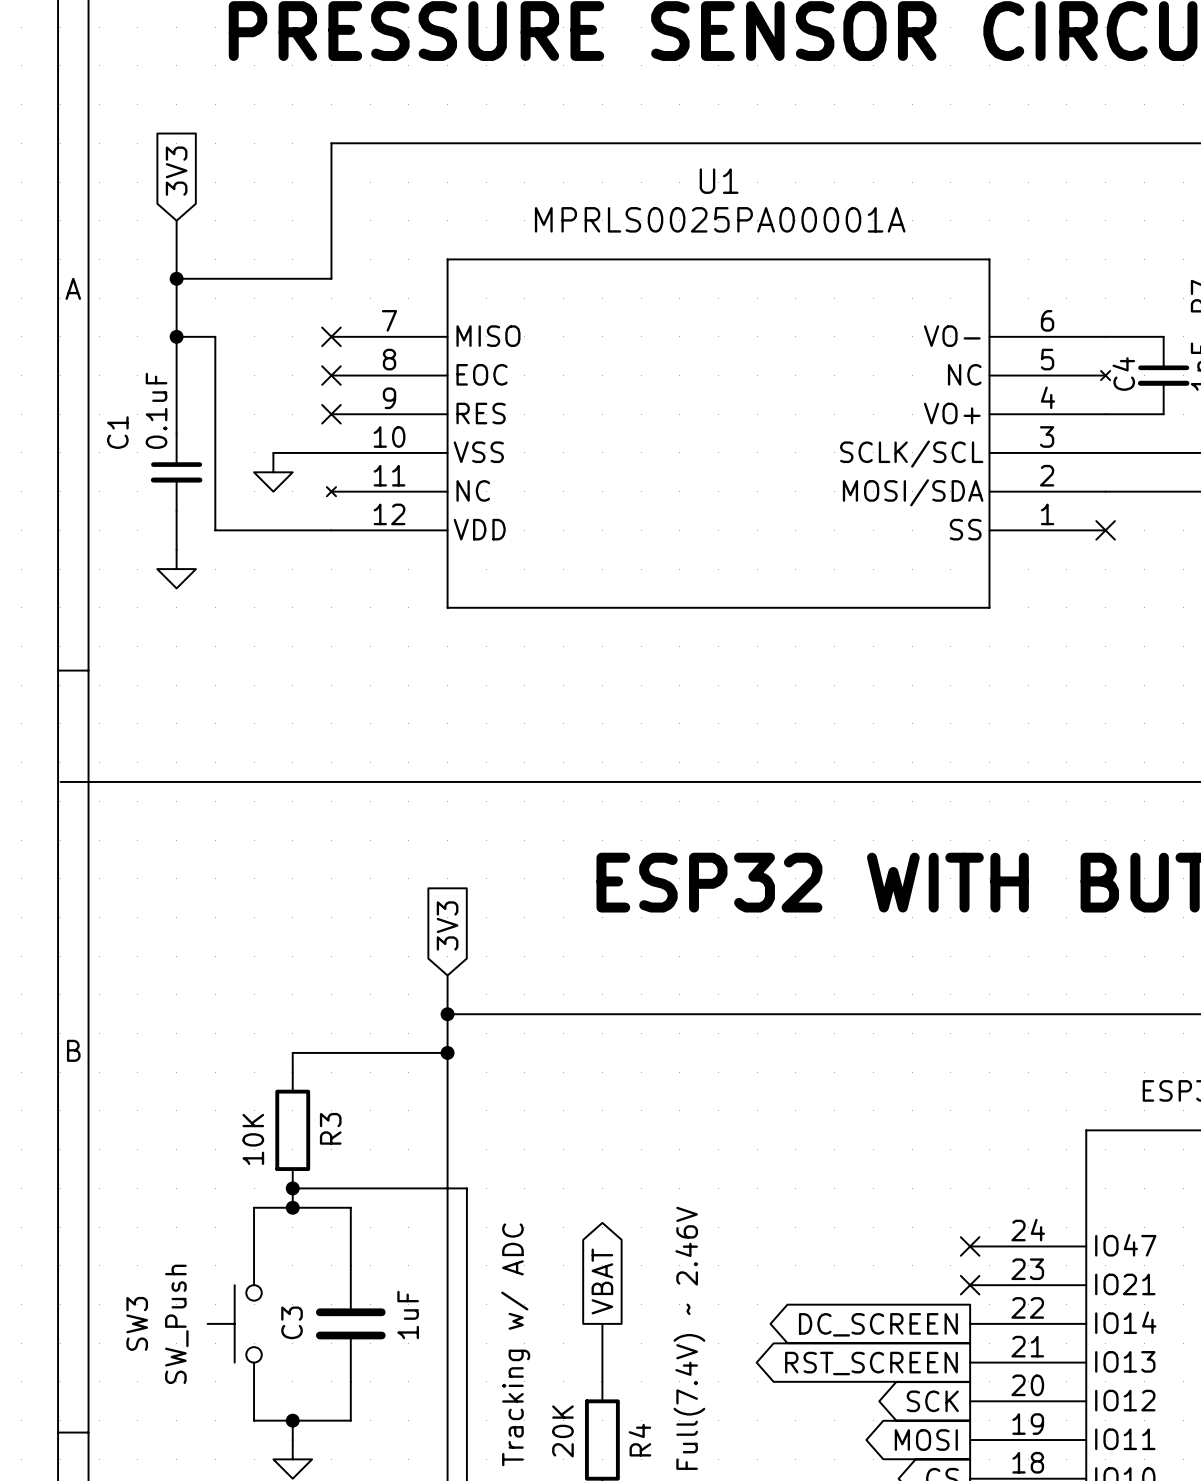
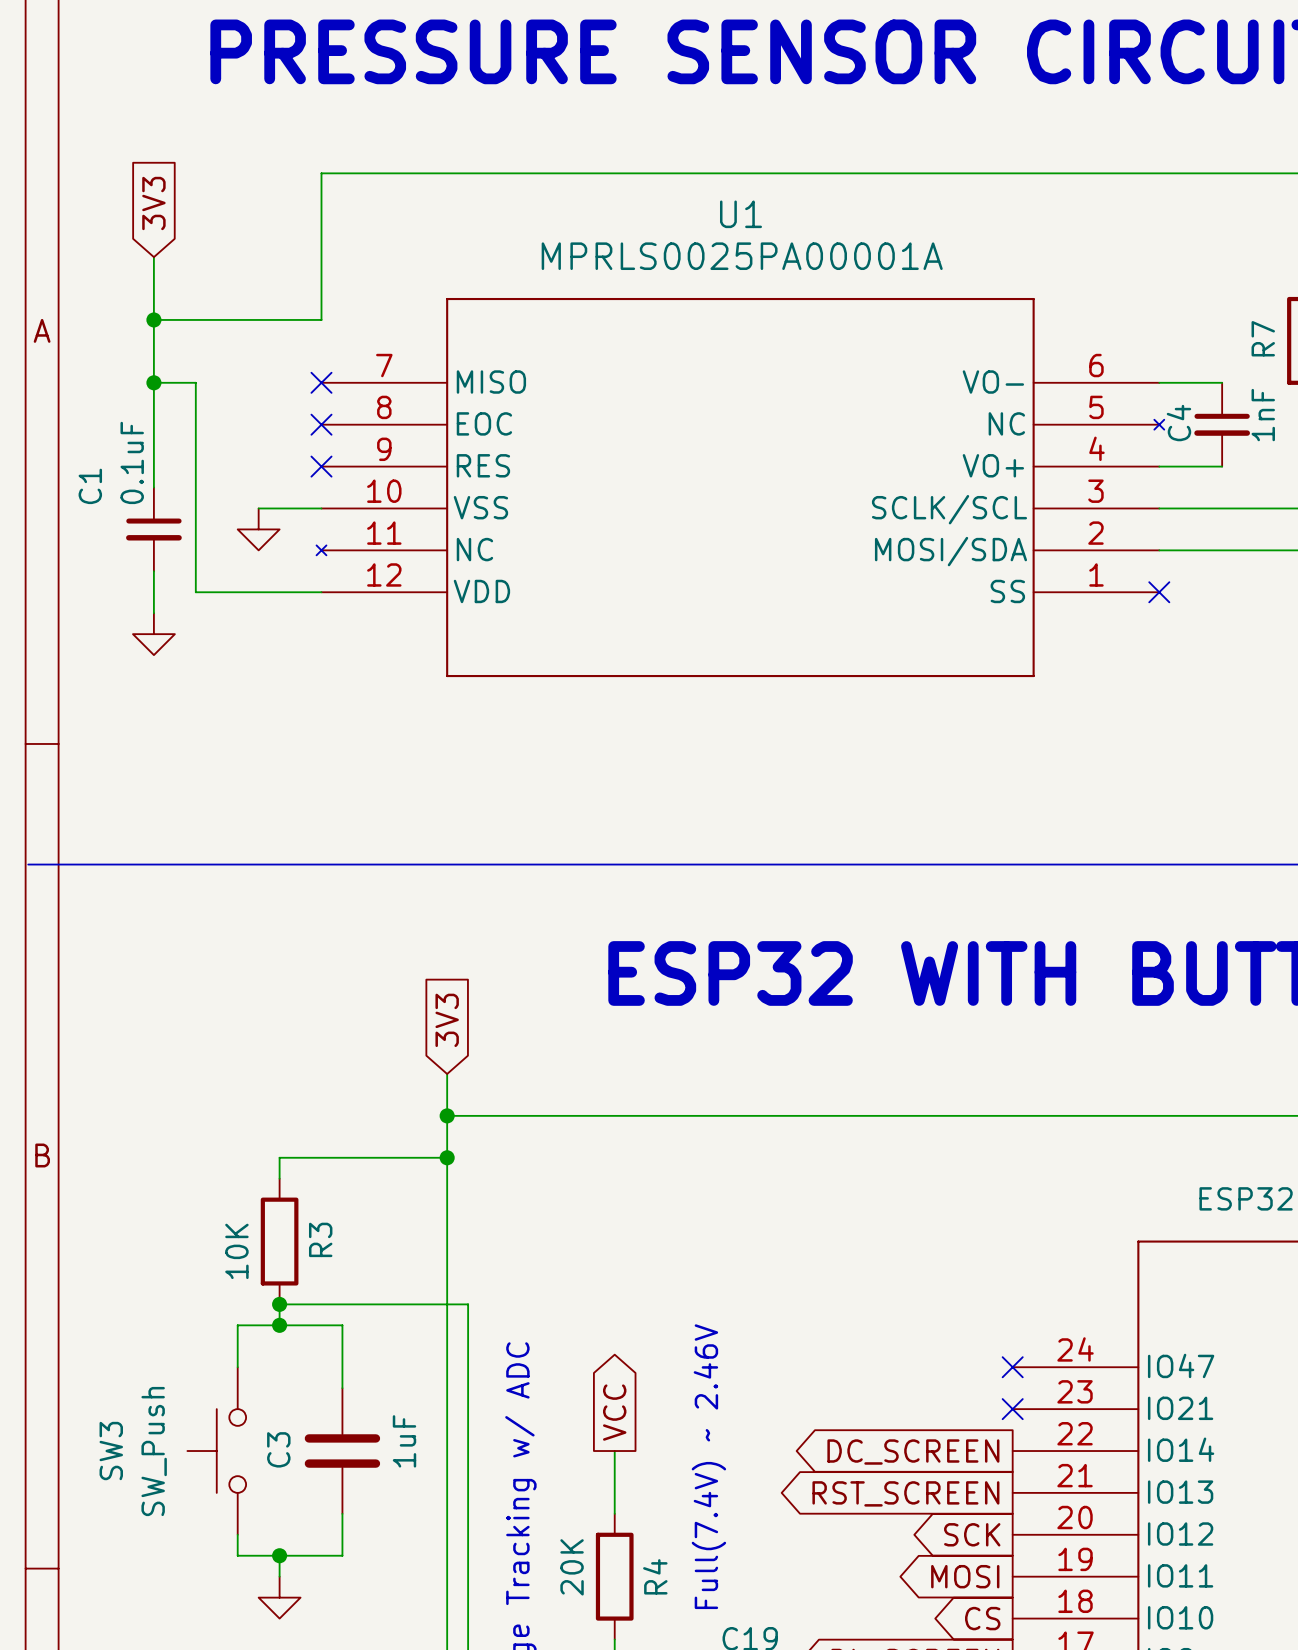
global label: VBAT (602, 1281) -> VCC (614, 1412)

